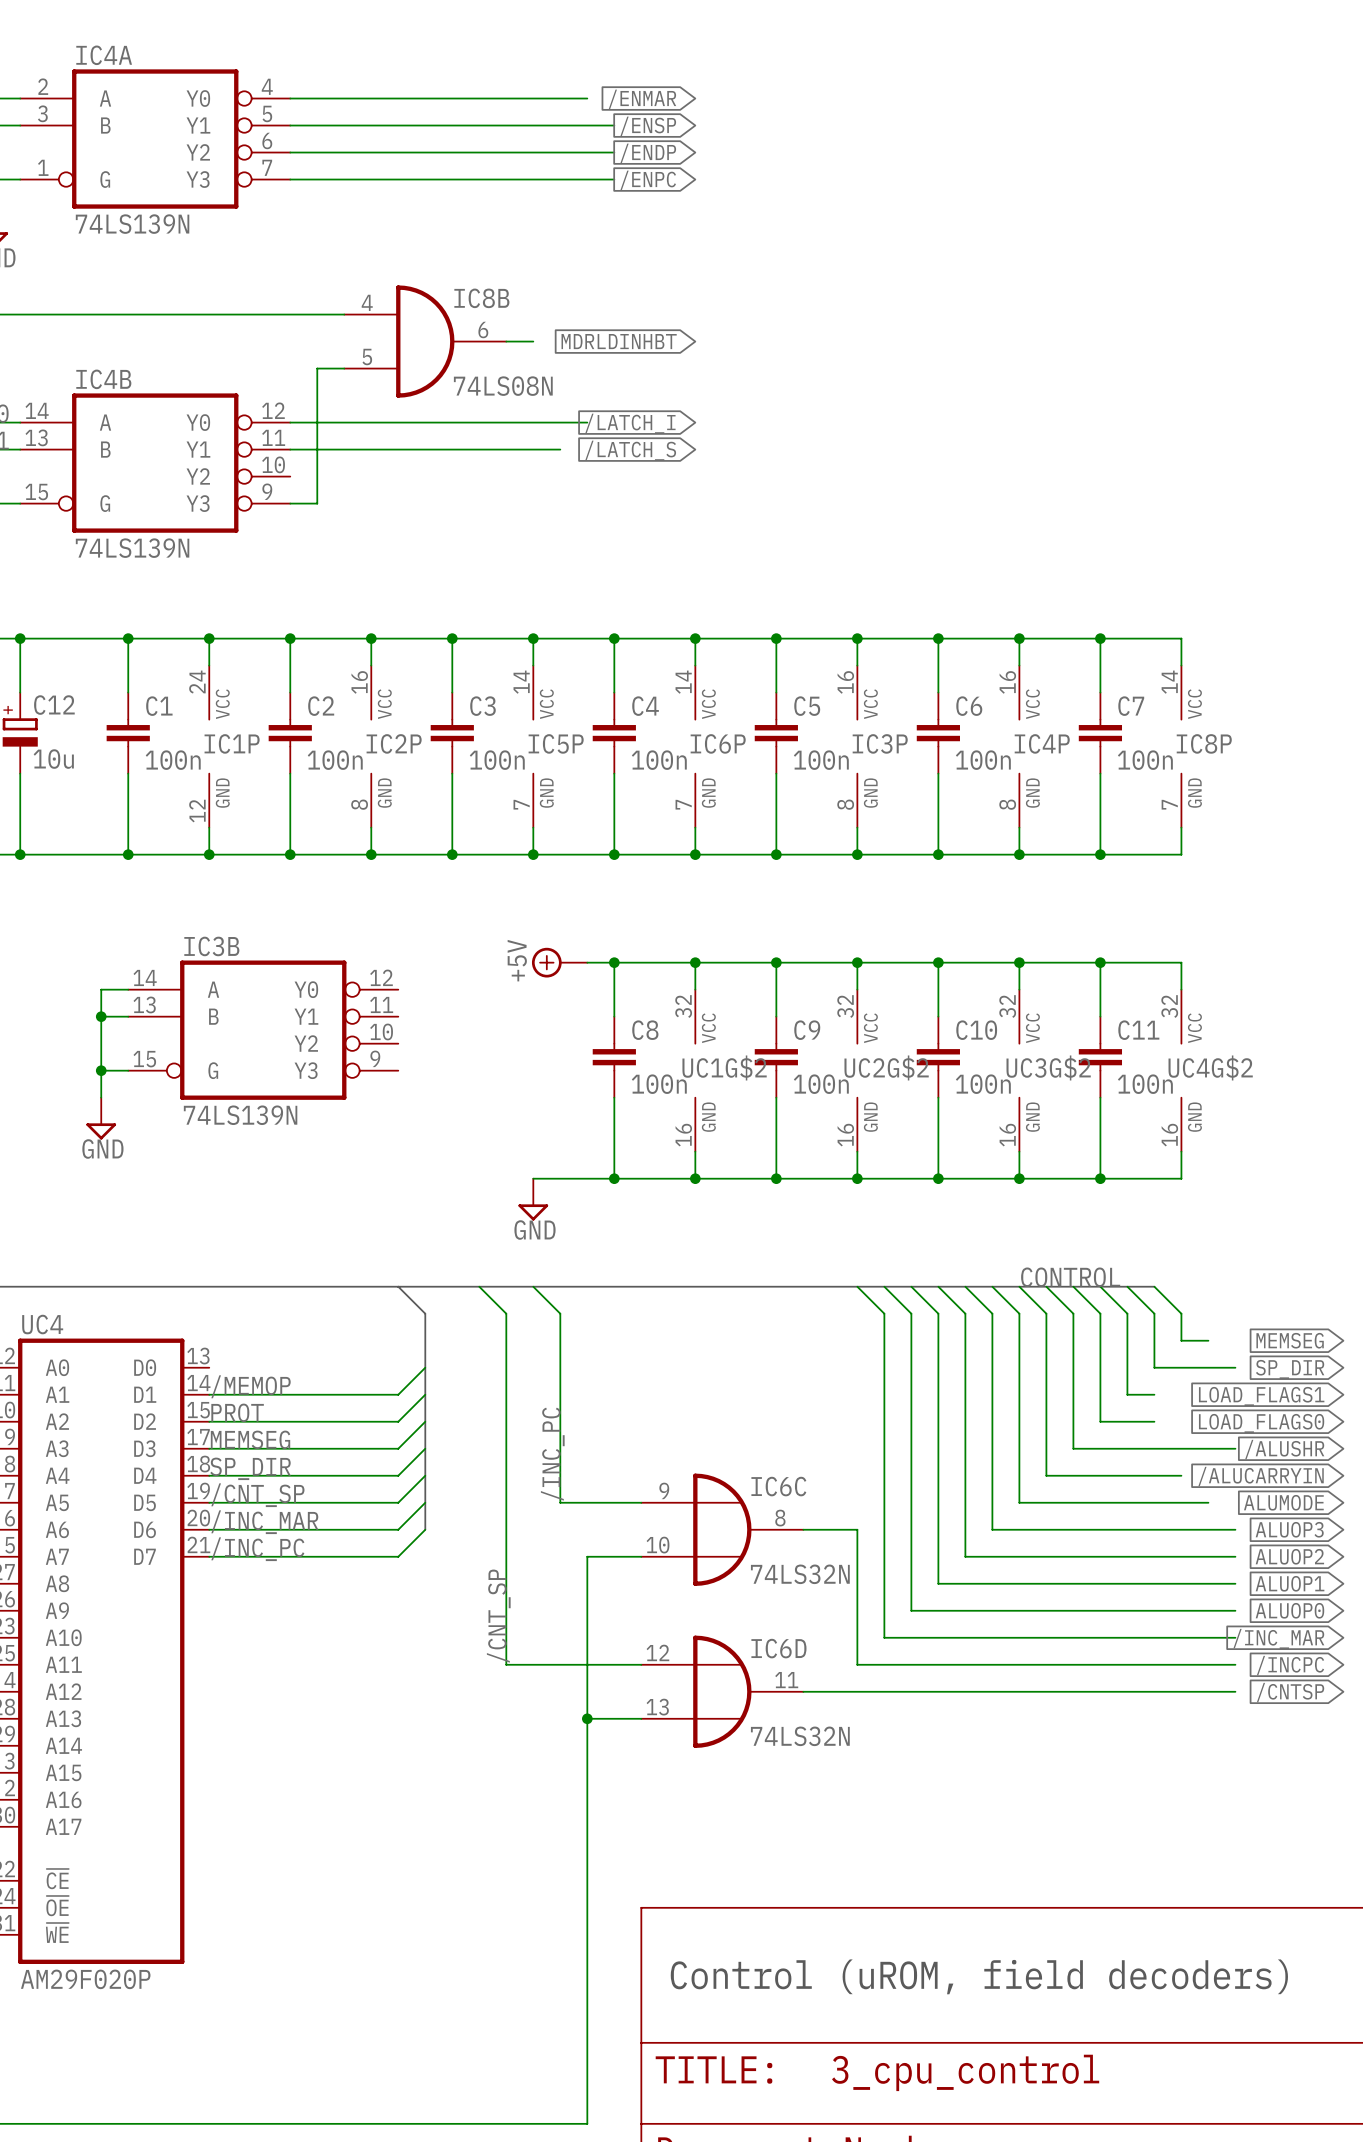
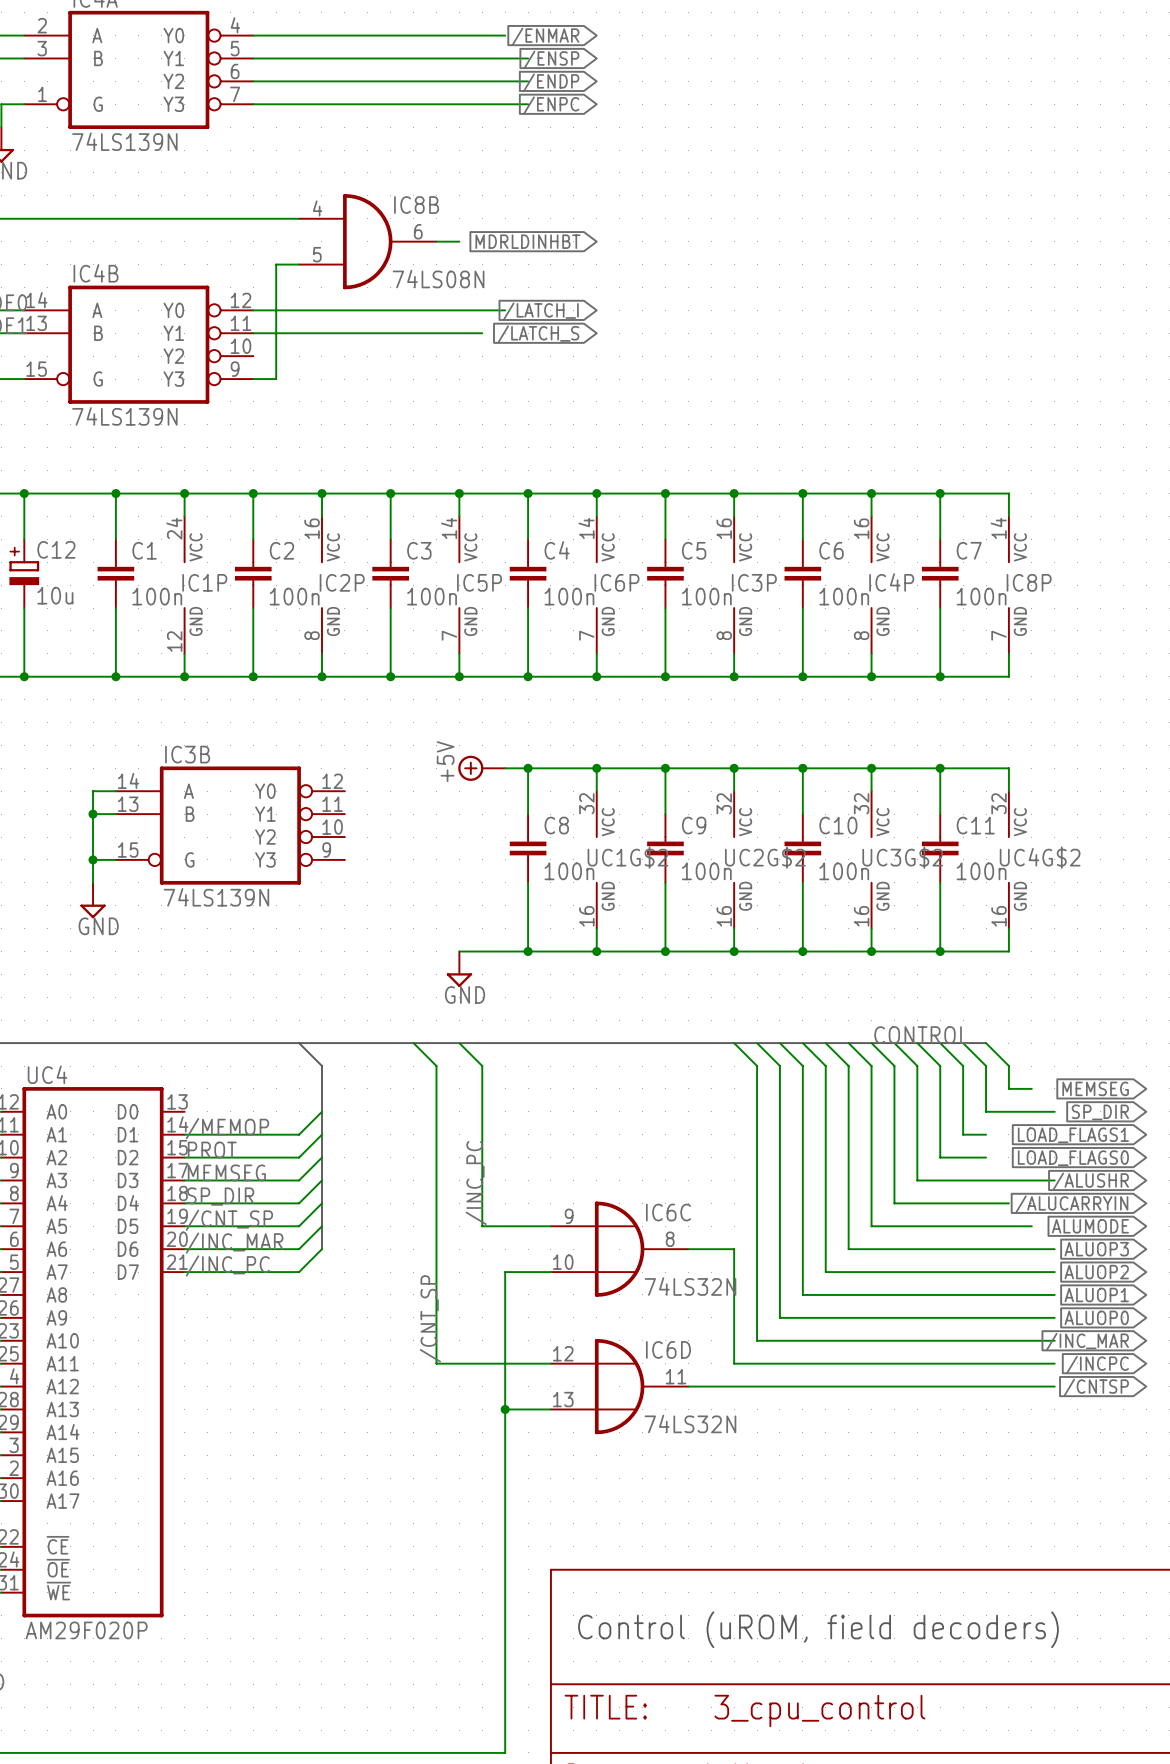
bus: (398, 1286) (425, 1313) (425, 1529) -> (299, 1043) (321, 1066) (321, 1249)
wire: (425, 1367) (398, 1394) (344, 1394) -> (321, 1111) (299, 1134)
wire: (425, 1394) (398, 1421) (344, 1421) -> (321, 1134) (299, 1157)
wire: (425, 1421) (398, 1448) (344, 1448) -> (321, 1157) (299, 1180)
wire: (425, 1448) (398, 1475) (344, 1475) -> (321, 1180) (299, 1203)
wire: (425, 1475) (398, 1502) (344, 1502) -> (321, 1203) (299, 1226)
wire: (425, 1502) (398, 1529) (344, 1529) -> (321, 1226) (299, 1249)
wire: (425, 1529) (398, 1556) (344, 1556) -> (321, 1249) (299, 1272)

